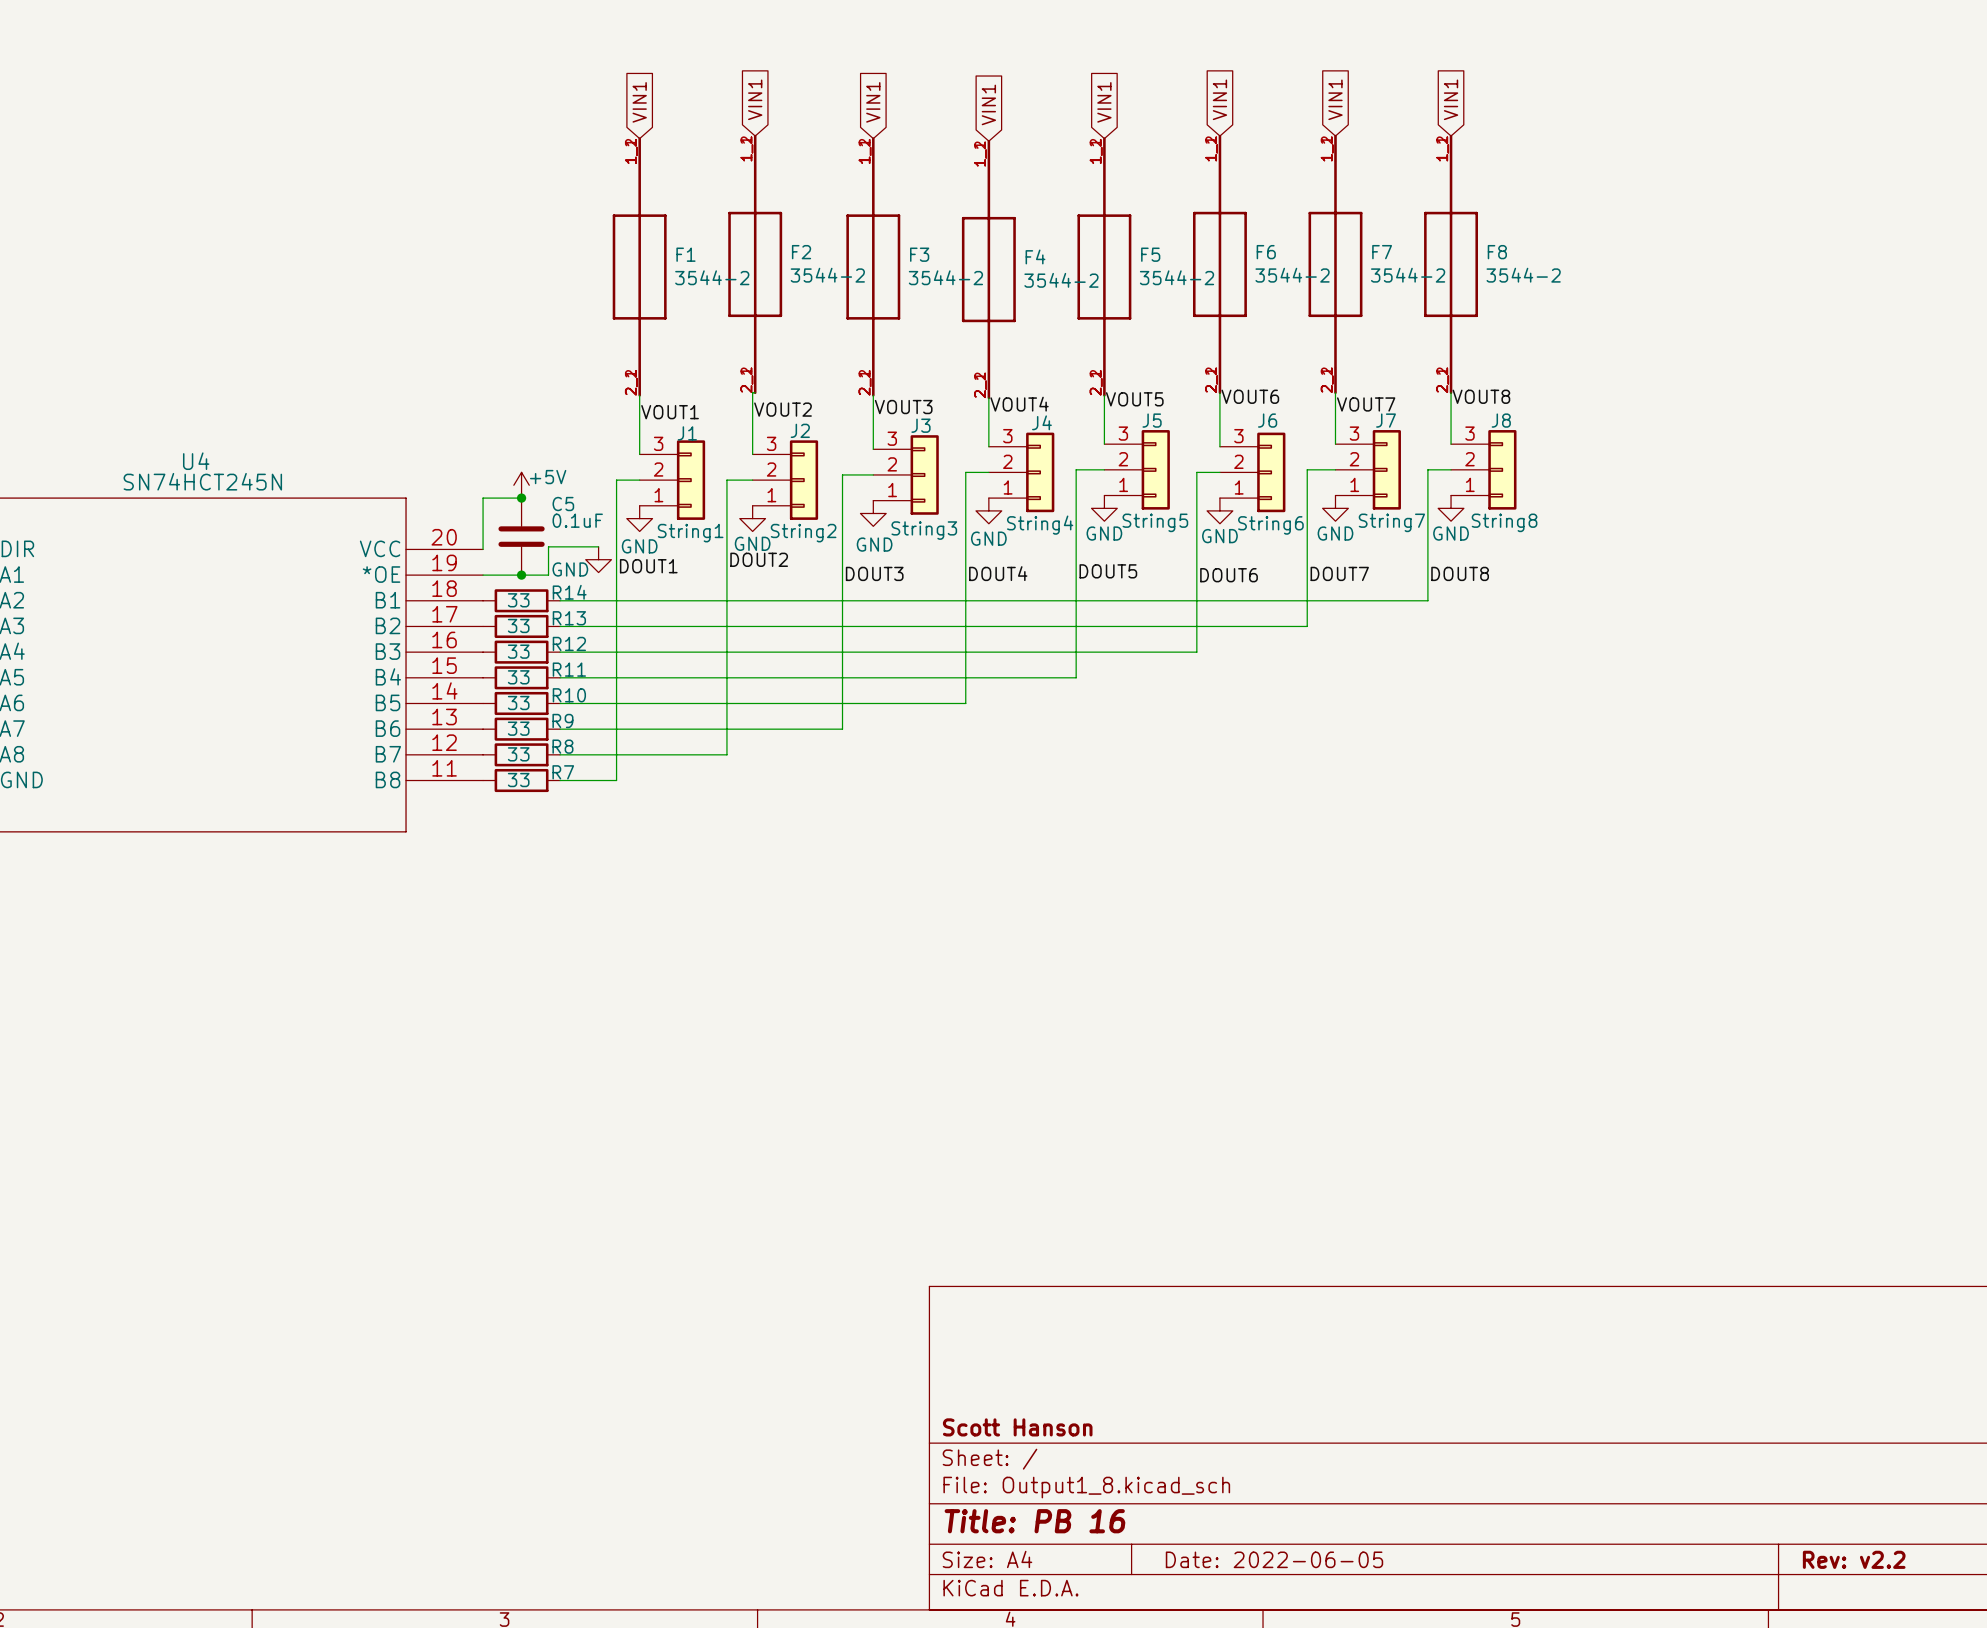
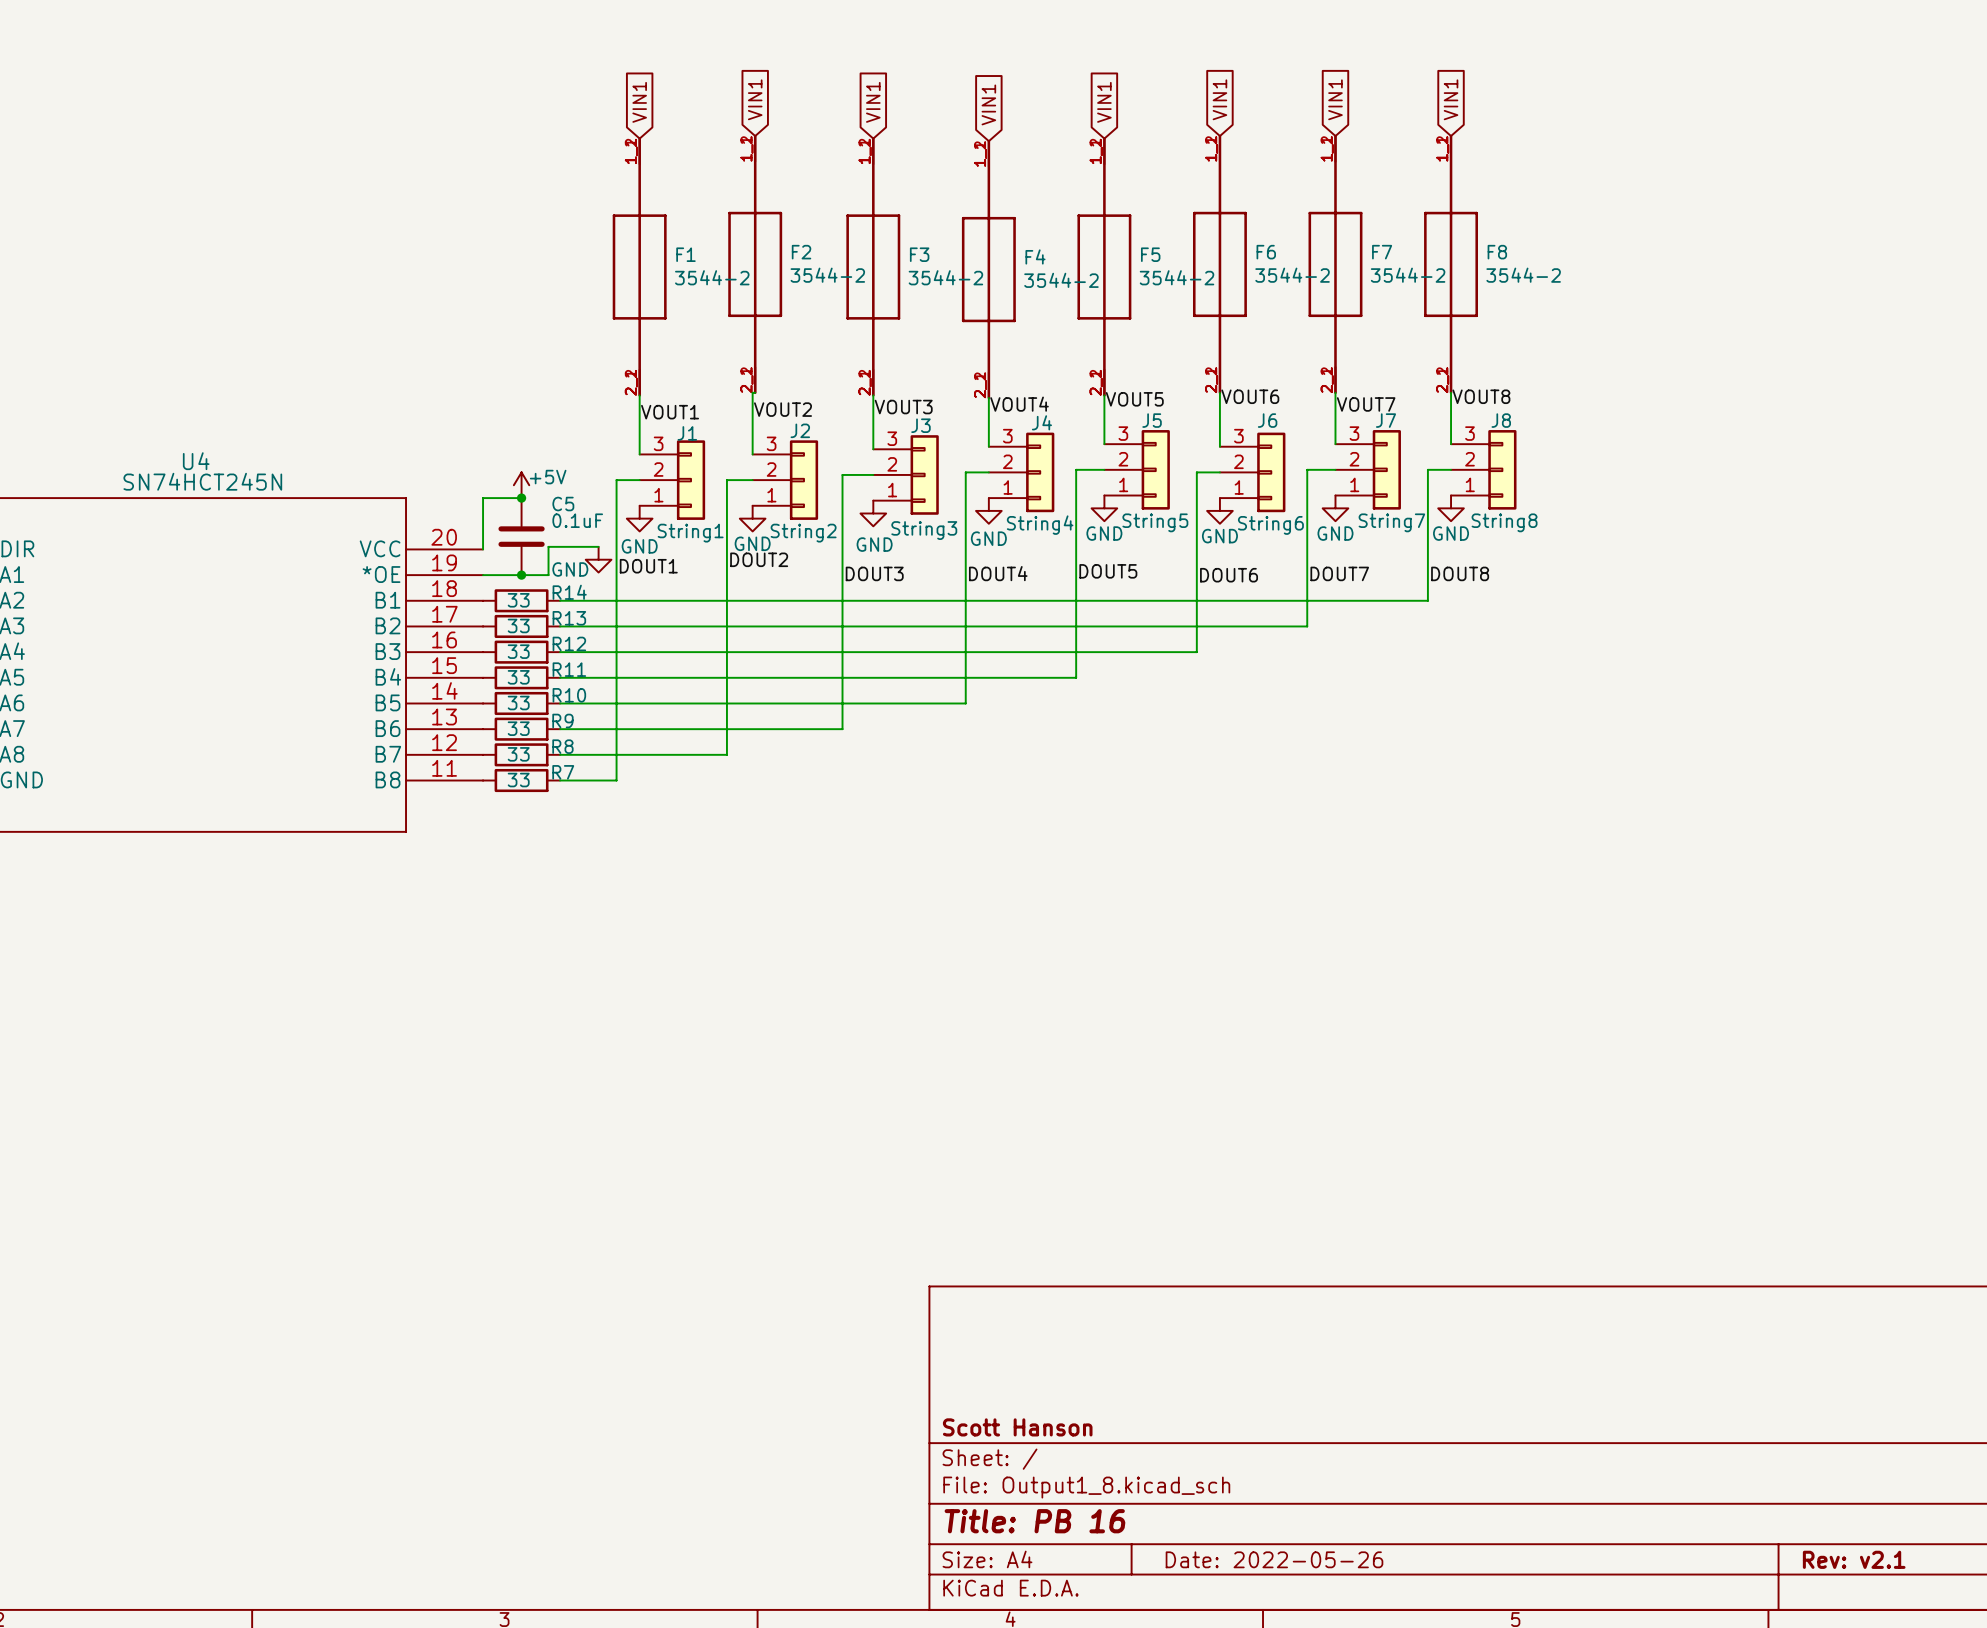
title block: Date: 2022-06-05 (1274, 1559) -> Date: 2022-05-26 (1274, 1559)
title block: Rev: v2.2 (1854, 1559) -> Rev: v2.1 (1854, 1559)

